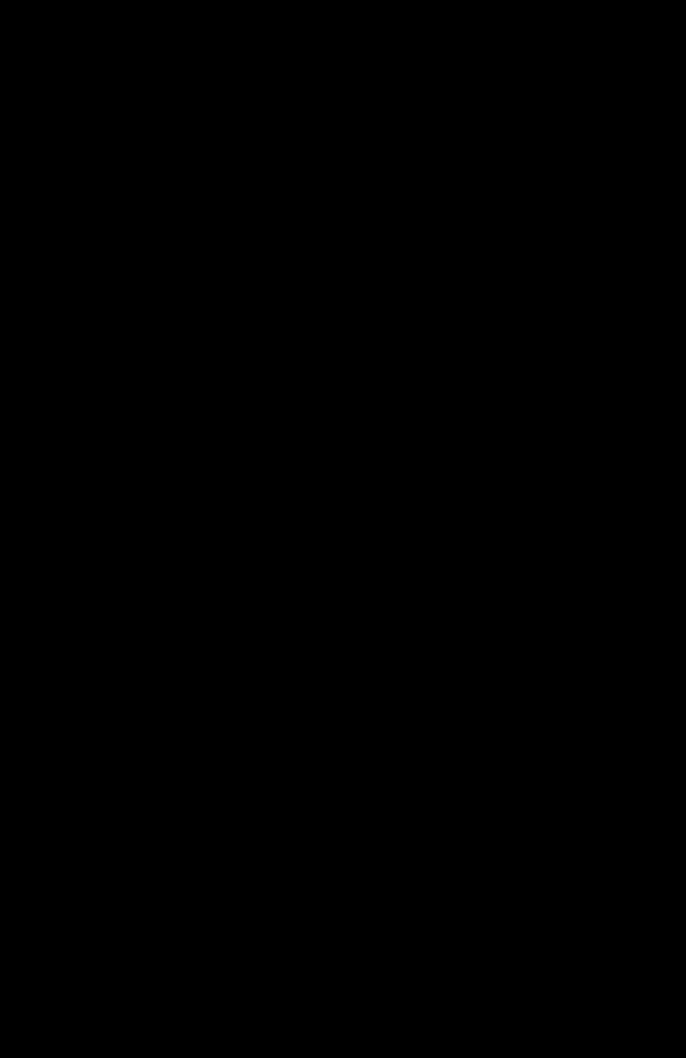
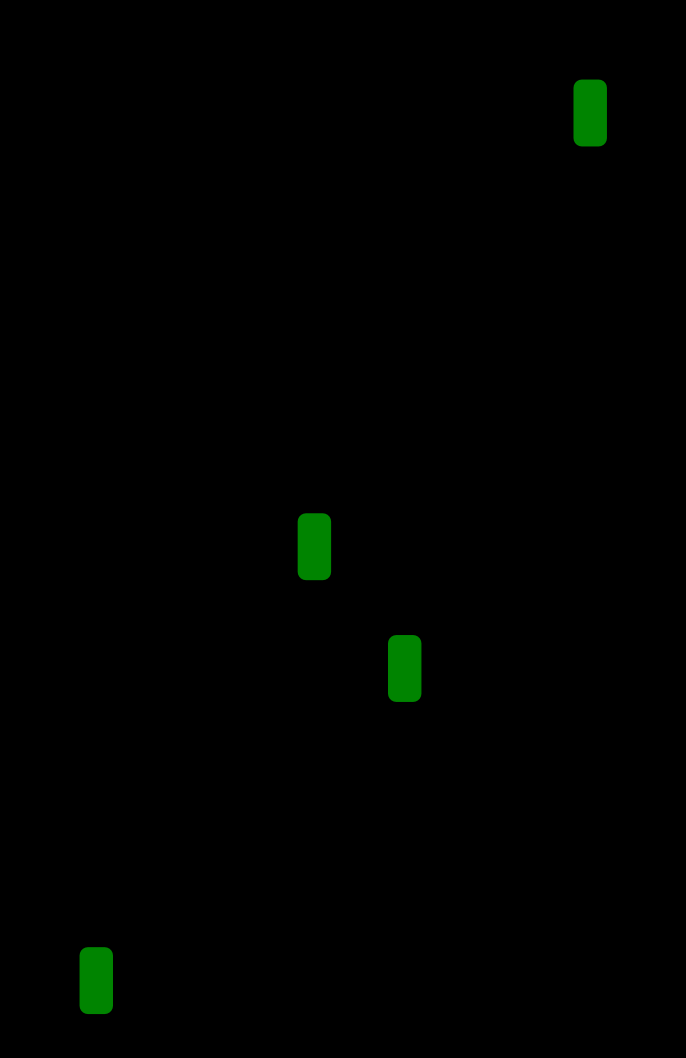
part: none -> (590, 113)
part: none -> (314, 546)
part: none -> (404, 668)
part: none -> (96, 980)

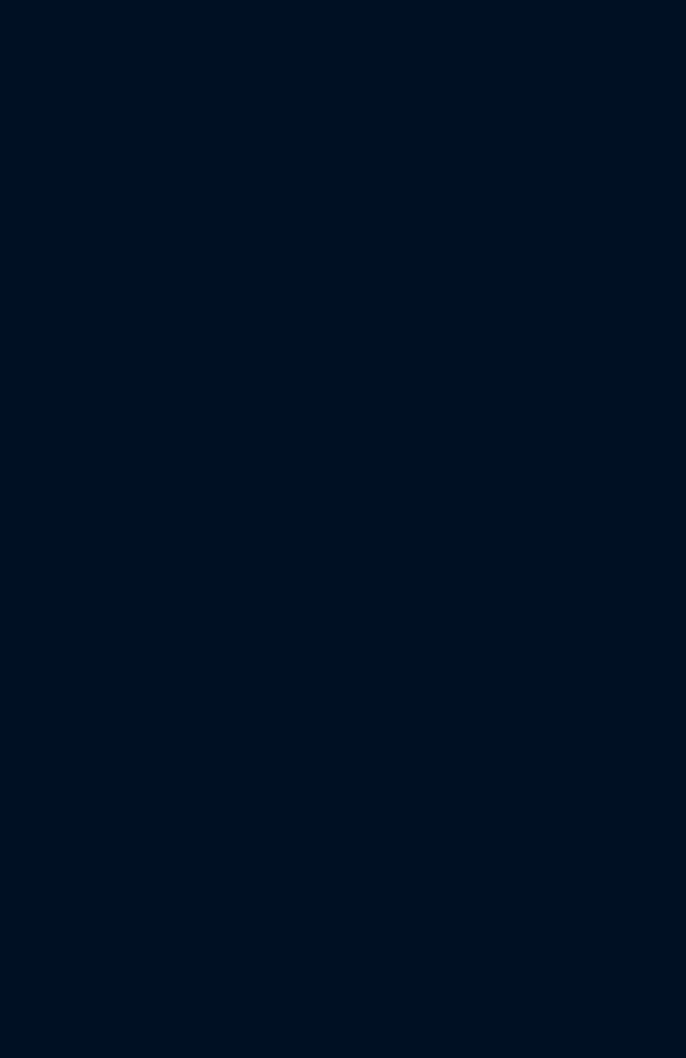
part: (590, 113) -> none
part: (314, 546) -> none
part: (404, 668) -> none
part: (96, 980) -> none

